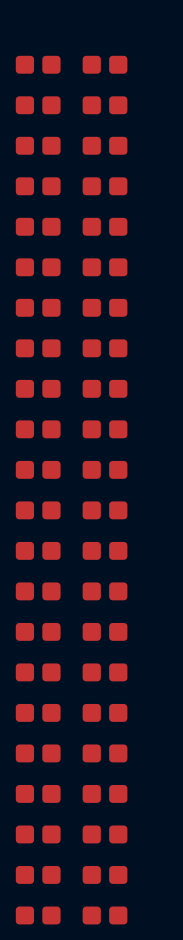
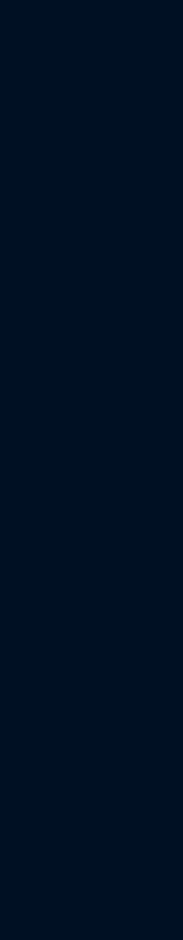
part: (38, 64) -> none
part: (105, 64) -> none
part: (38, 105) -> none
part: (105, 105) -> none
part: (38, 145) -> none
part: (105, 145) -> none
part: (38, 186) -> none
part: (105, 186) -> none
part: (38, 226) -> none
part: (105, 226) -> none
part: (38, 267) -> none
part: (105, 267) -> none
part: (38, 307) -> none
part: (105, 307) -> none
part: (38, 348) -> none
part: (105, 348) -> none
part: (38, 388) -> none
part: (105, 388) -> none
part: (38, 429) -> none
part: (105, 429) -> none
part: (38, 469) -> none
part: (105, 469) -> none
part: (38, 510) -> none
part: (105, 510) -> none
part: (38, 550) -> none
part: (105, 550) -> none
part: (38, 591) -> none
part: (105, 591) -> none
part: (38, 631) -> none
part: (105, 631) -> none
part: (38, 672) -> none
part: (105, 672) -> none
part: (38, 712) -> none
part: (105, 712) -> none
part: (38, 753) -> none
part: (105, 753) -> none
part: (38, 793) -> none
part: (105, 793) -> none
part: (38, 834) -> none
part: (105, 834) -> none
part: (38, 874) -> none
part: (105, 874) -> none
part: (38, 915) -> none
part: (105, 915) -> none

